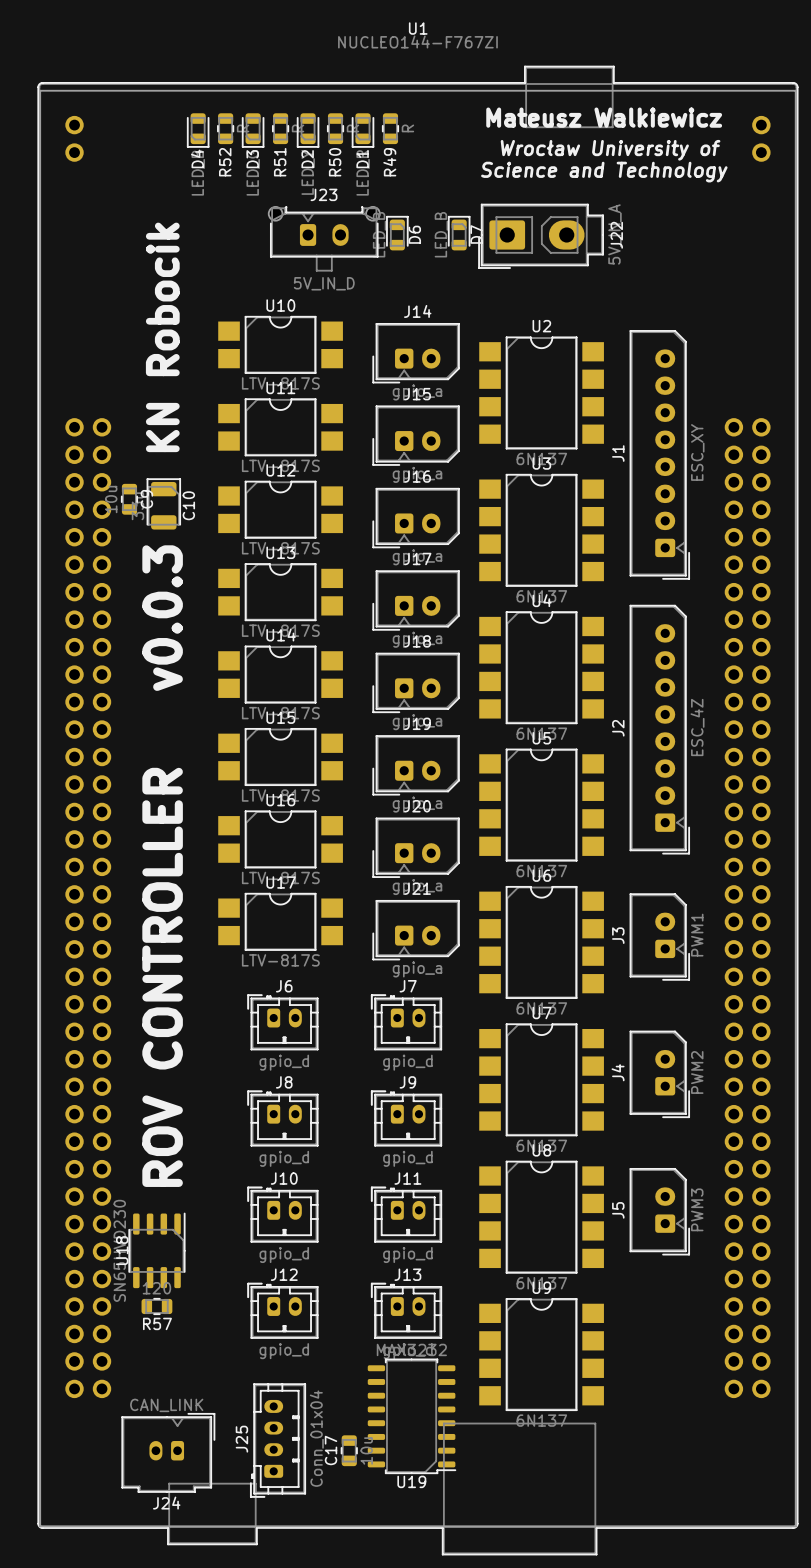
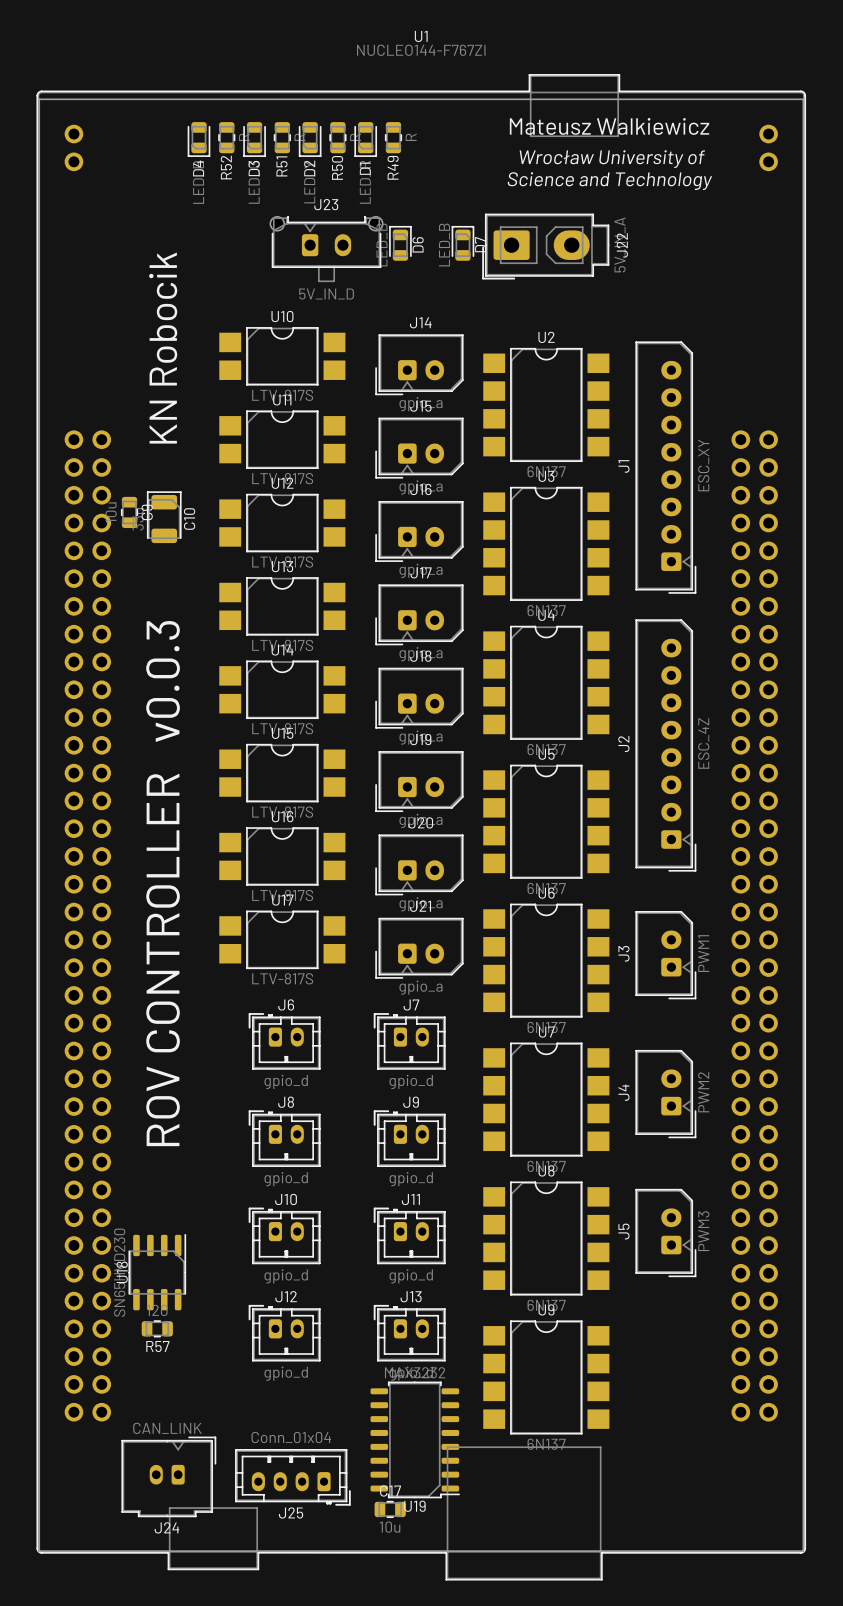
J25 rotation: 0° (278, 1440) -> 90° counterclockwise (292, 1477)
C17 rotation: 0° (349, 1450) -> 90° clockwise (390, 1509)
C17 position: (349, 1450) -> (390, 1509)

